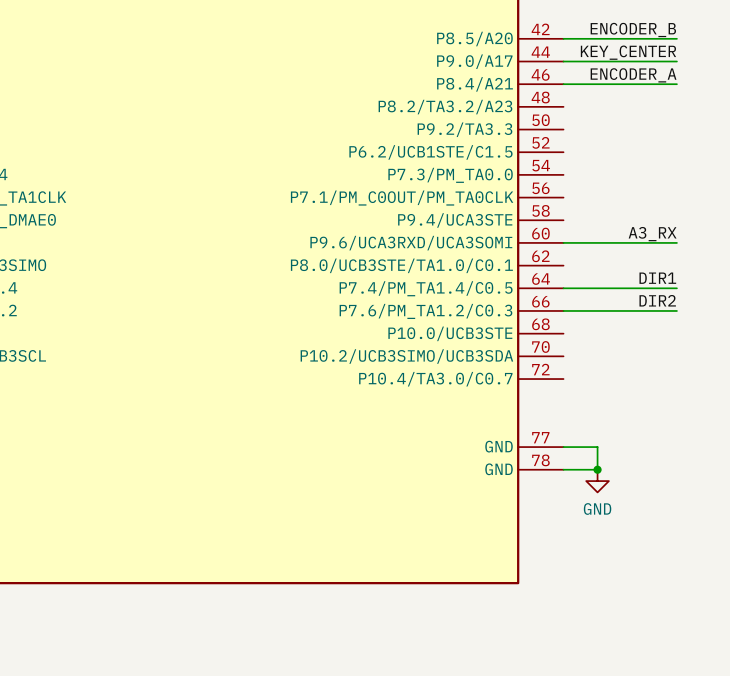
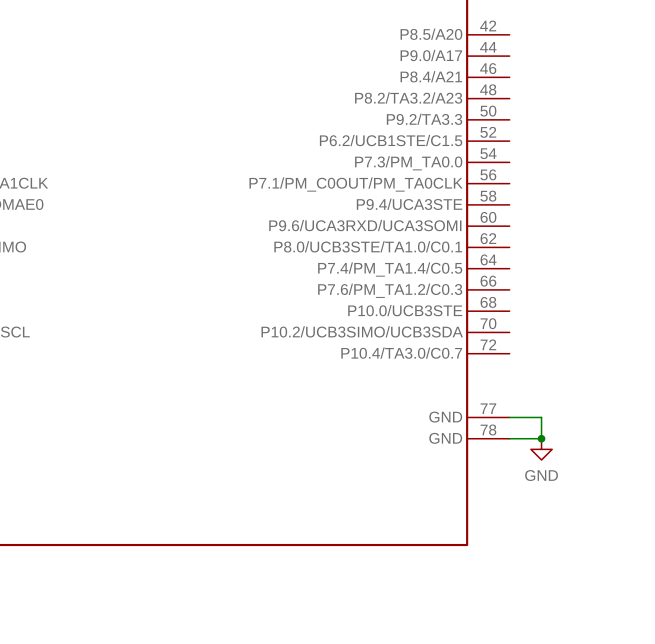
label: ENCODER_B (633, 29) -> none
wire: (563, 38) (676, 38) -> none
label: KEY_CENTER (628, 52) -> none
wire: (563, 61) (676, 61) -> none
label: ENCODER_A (633, 75) -> none
wire: (563, 84) (676, 84) -> none
label: A3_RX (652, 234) -> none
wire: (563, 242) (676, 242) -> none
label: DIR1 (657, 278) -> none
wire: (563, 288) (676, 288) -> none
label: DIR2 (657, 300) -> none
wire: (563, 310) (676, 310) -> none

